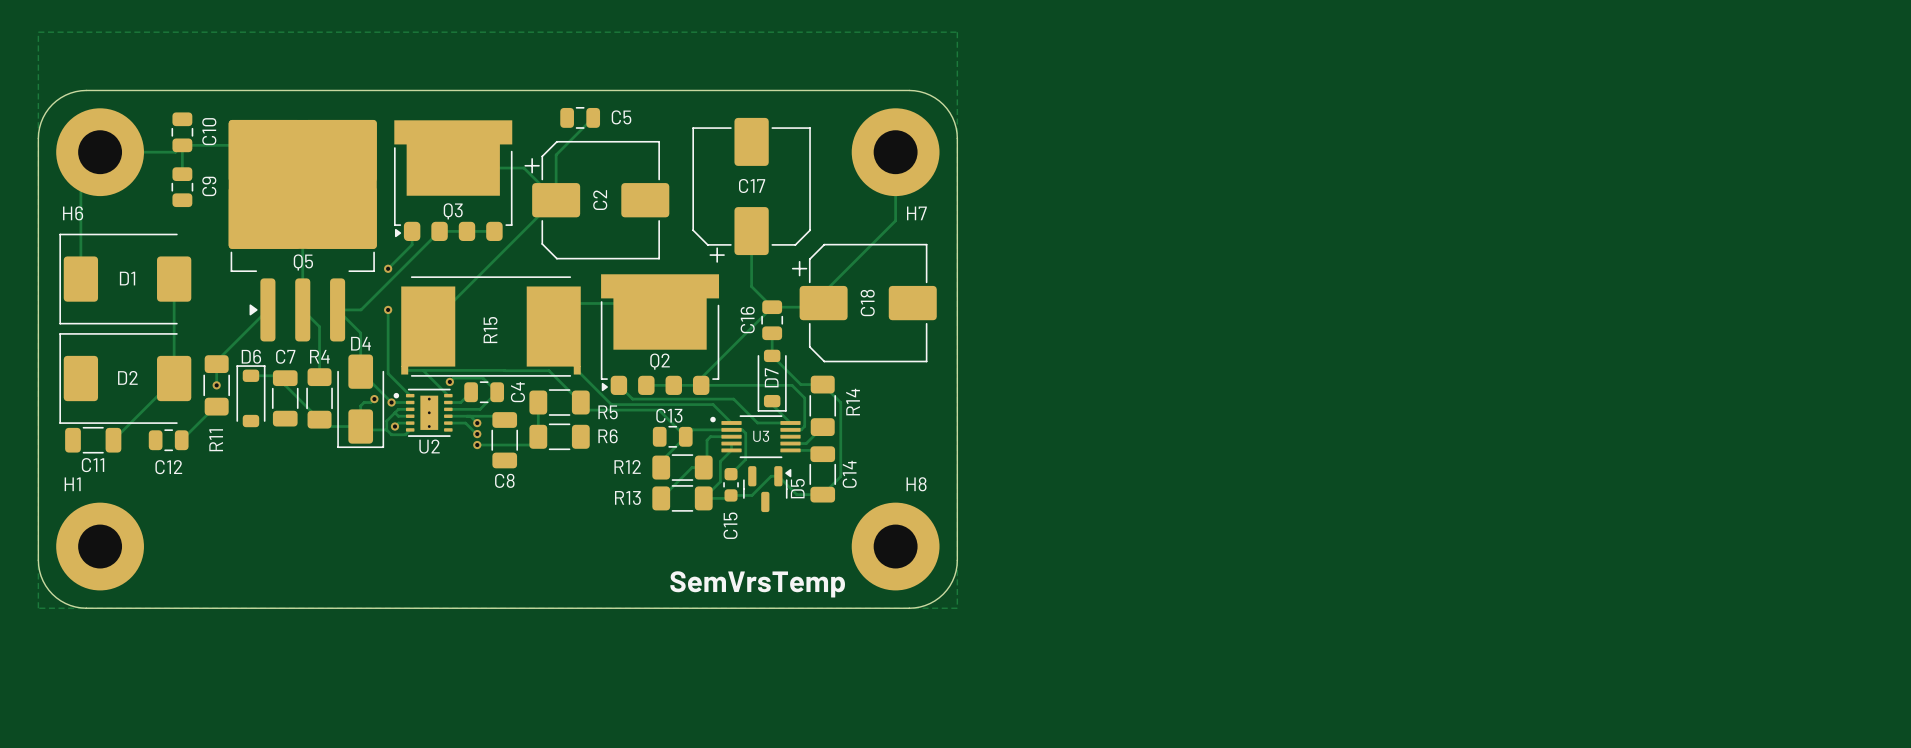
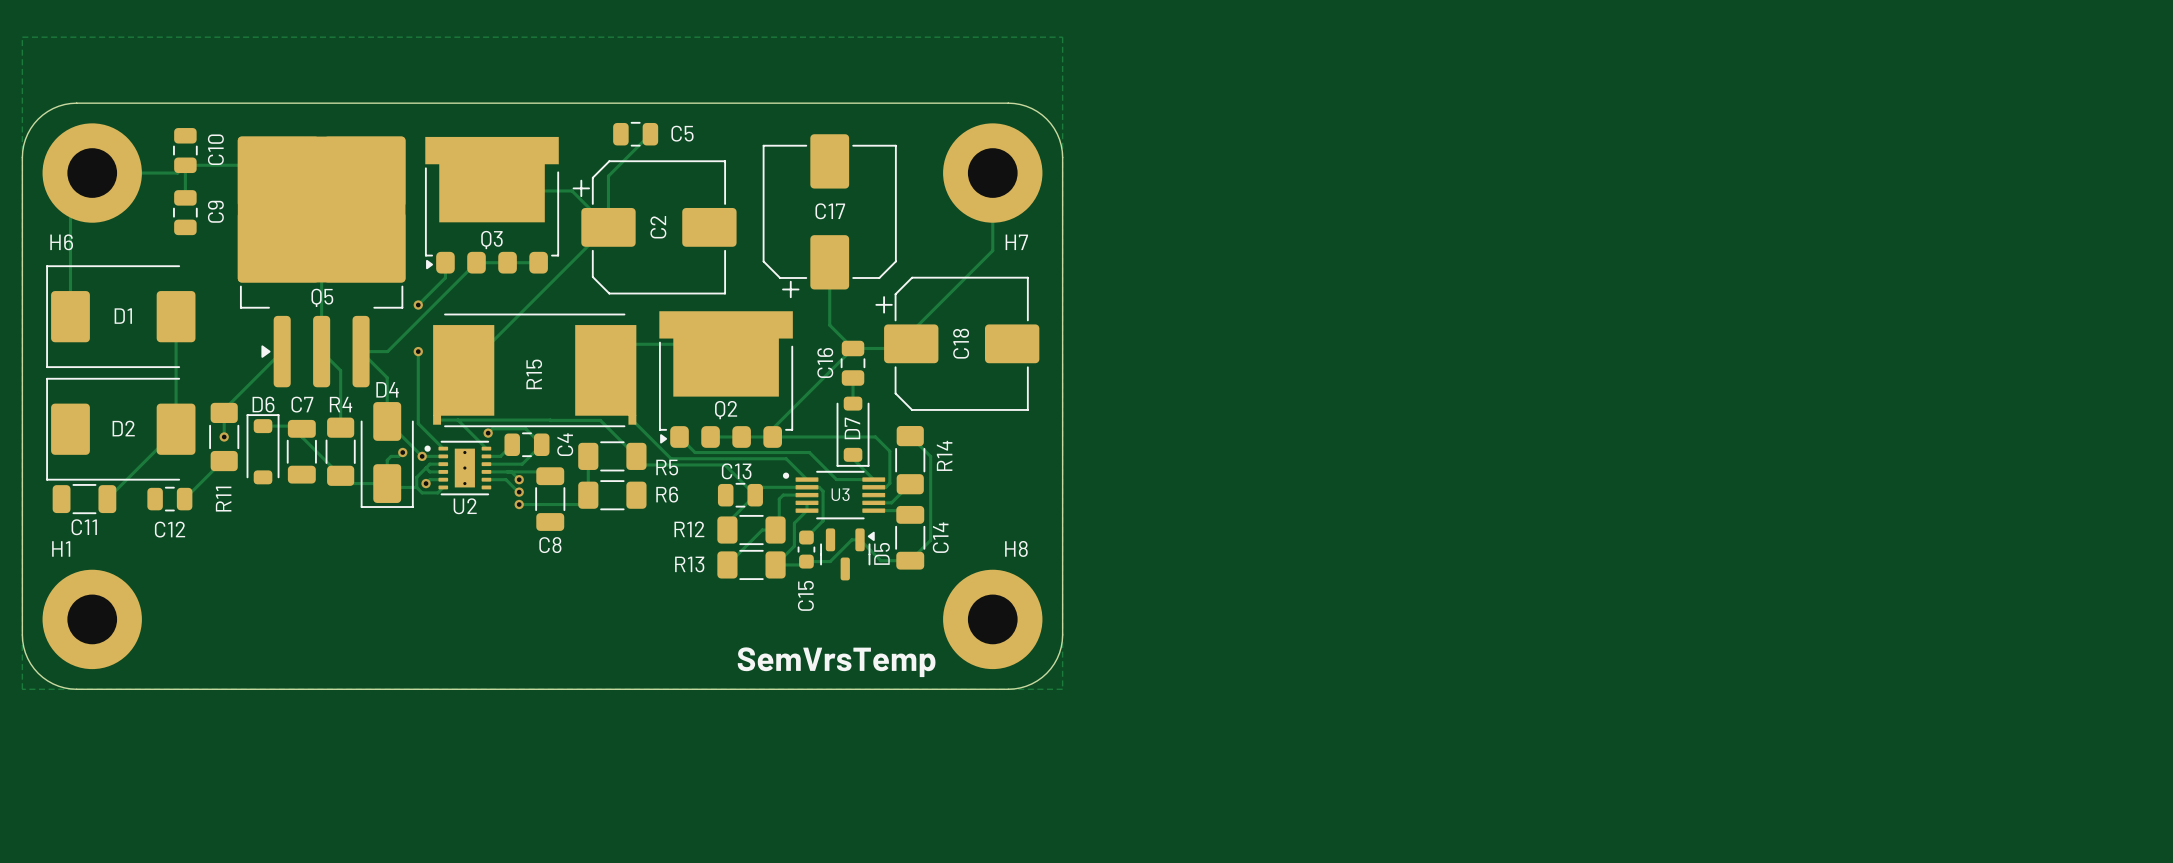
track: (772, 355) (800, 384) (822, 384) -> none

